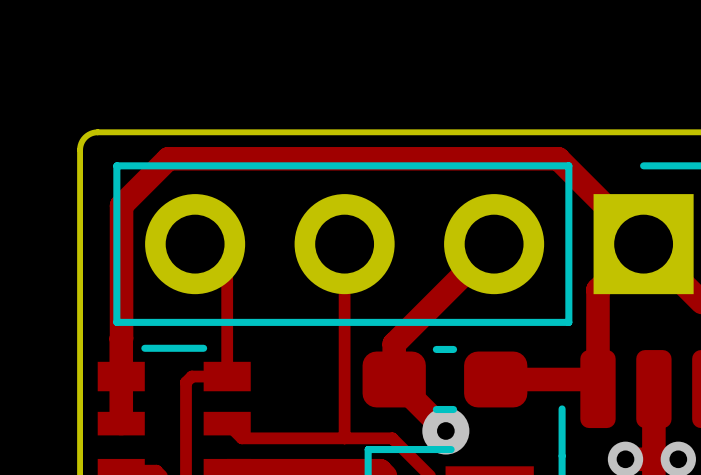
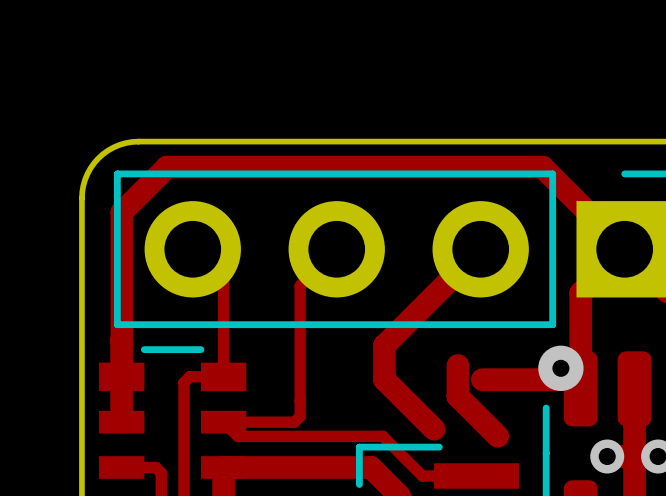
board edge: (138, 132) (95, 132) (85, 137) (80, 147) (80, 191) -> (138, 141) (119, 144) (98, 158) (85, 179) (81, 198)
track: (344, 244) (344, 438) -> (336, 249) (300, 285) (300, 416) (294, 422) (223, 422) (229, 416)
track: none -> (457, 365) (457, 396) (497, 436)
via: none -> (560, 368)
part: (444, 379) -> none
via: (445, 430) -> none

